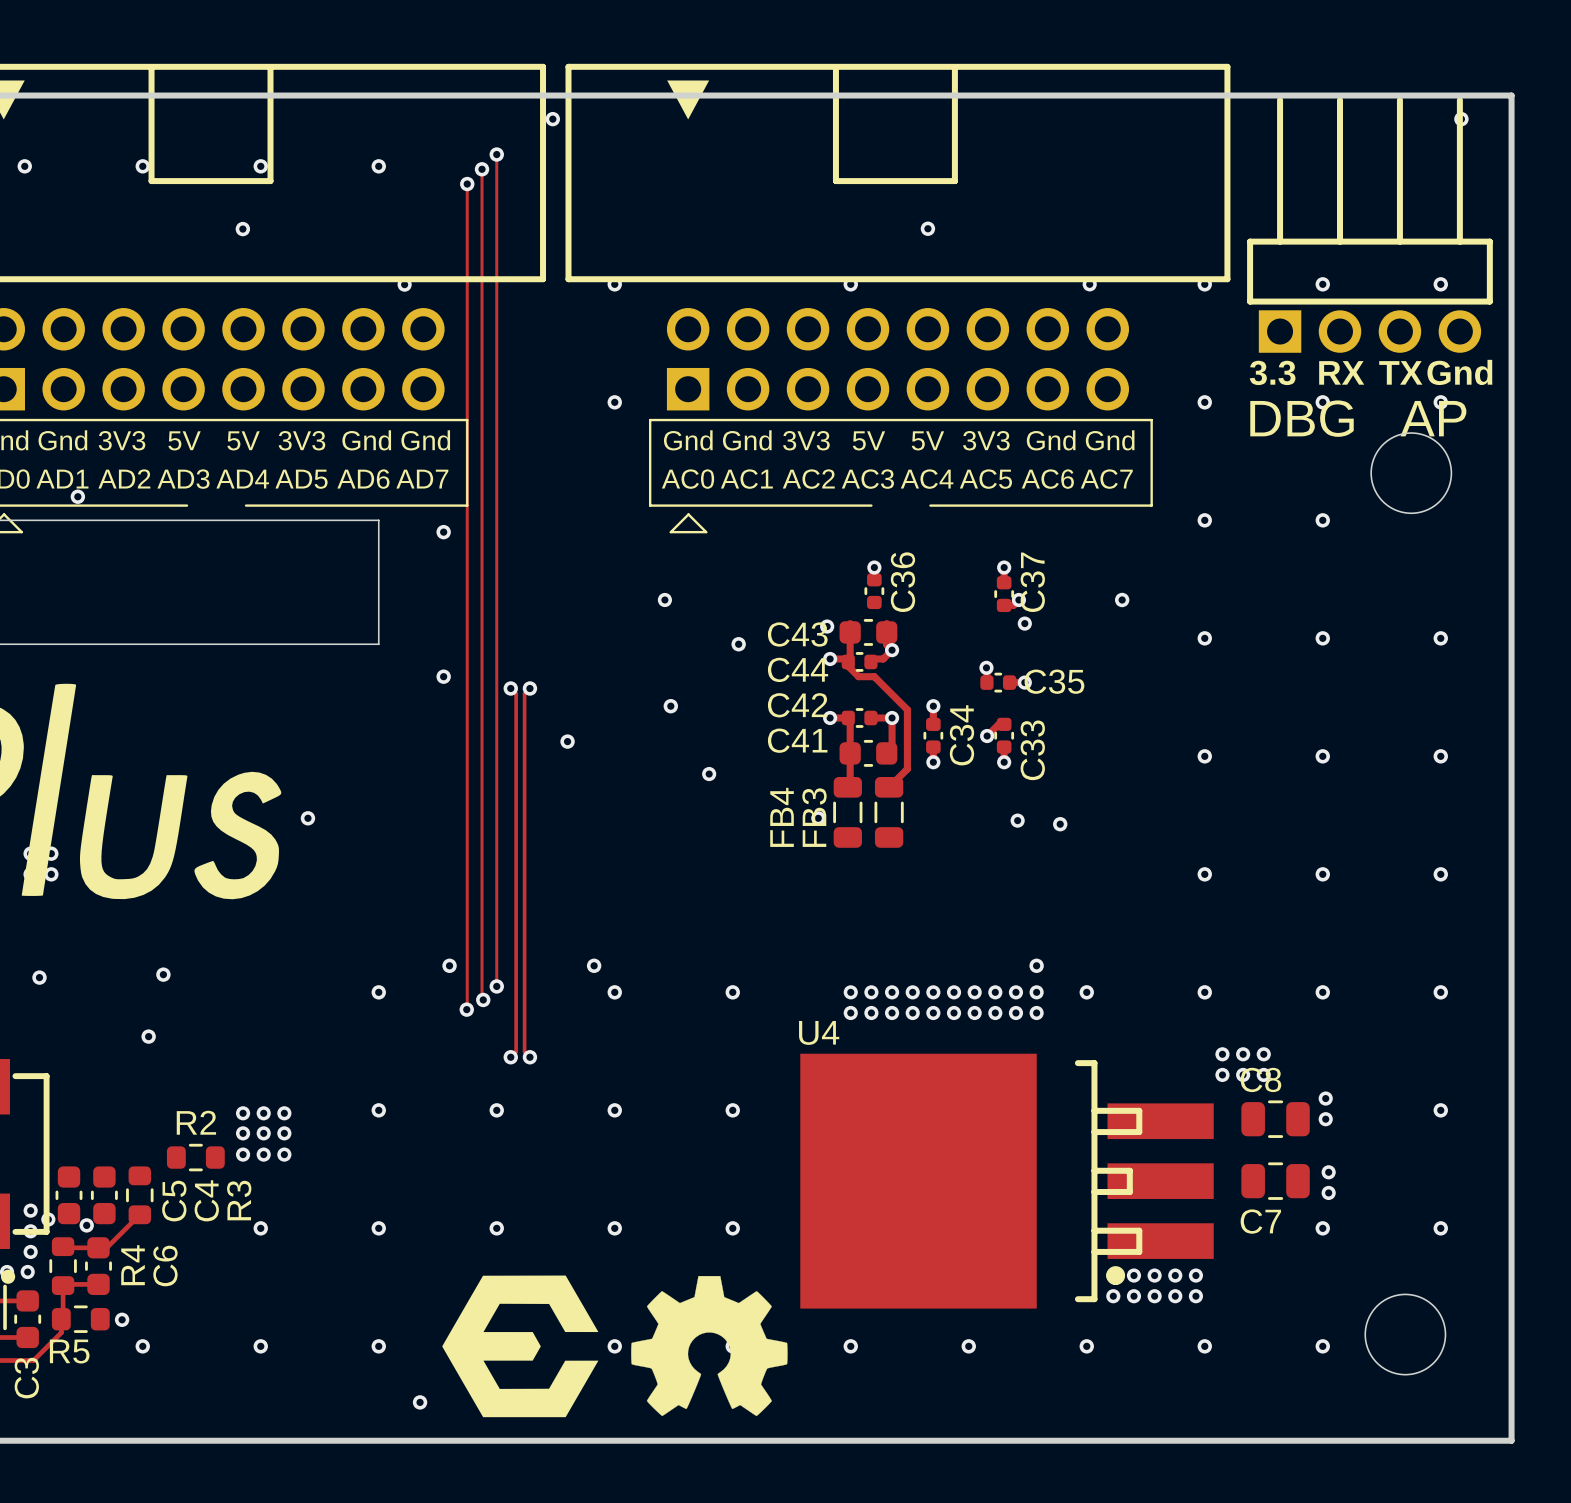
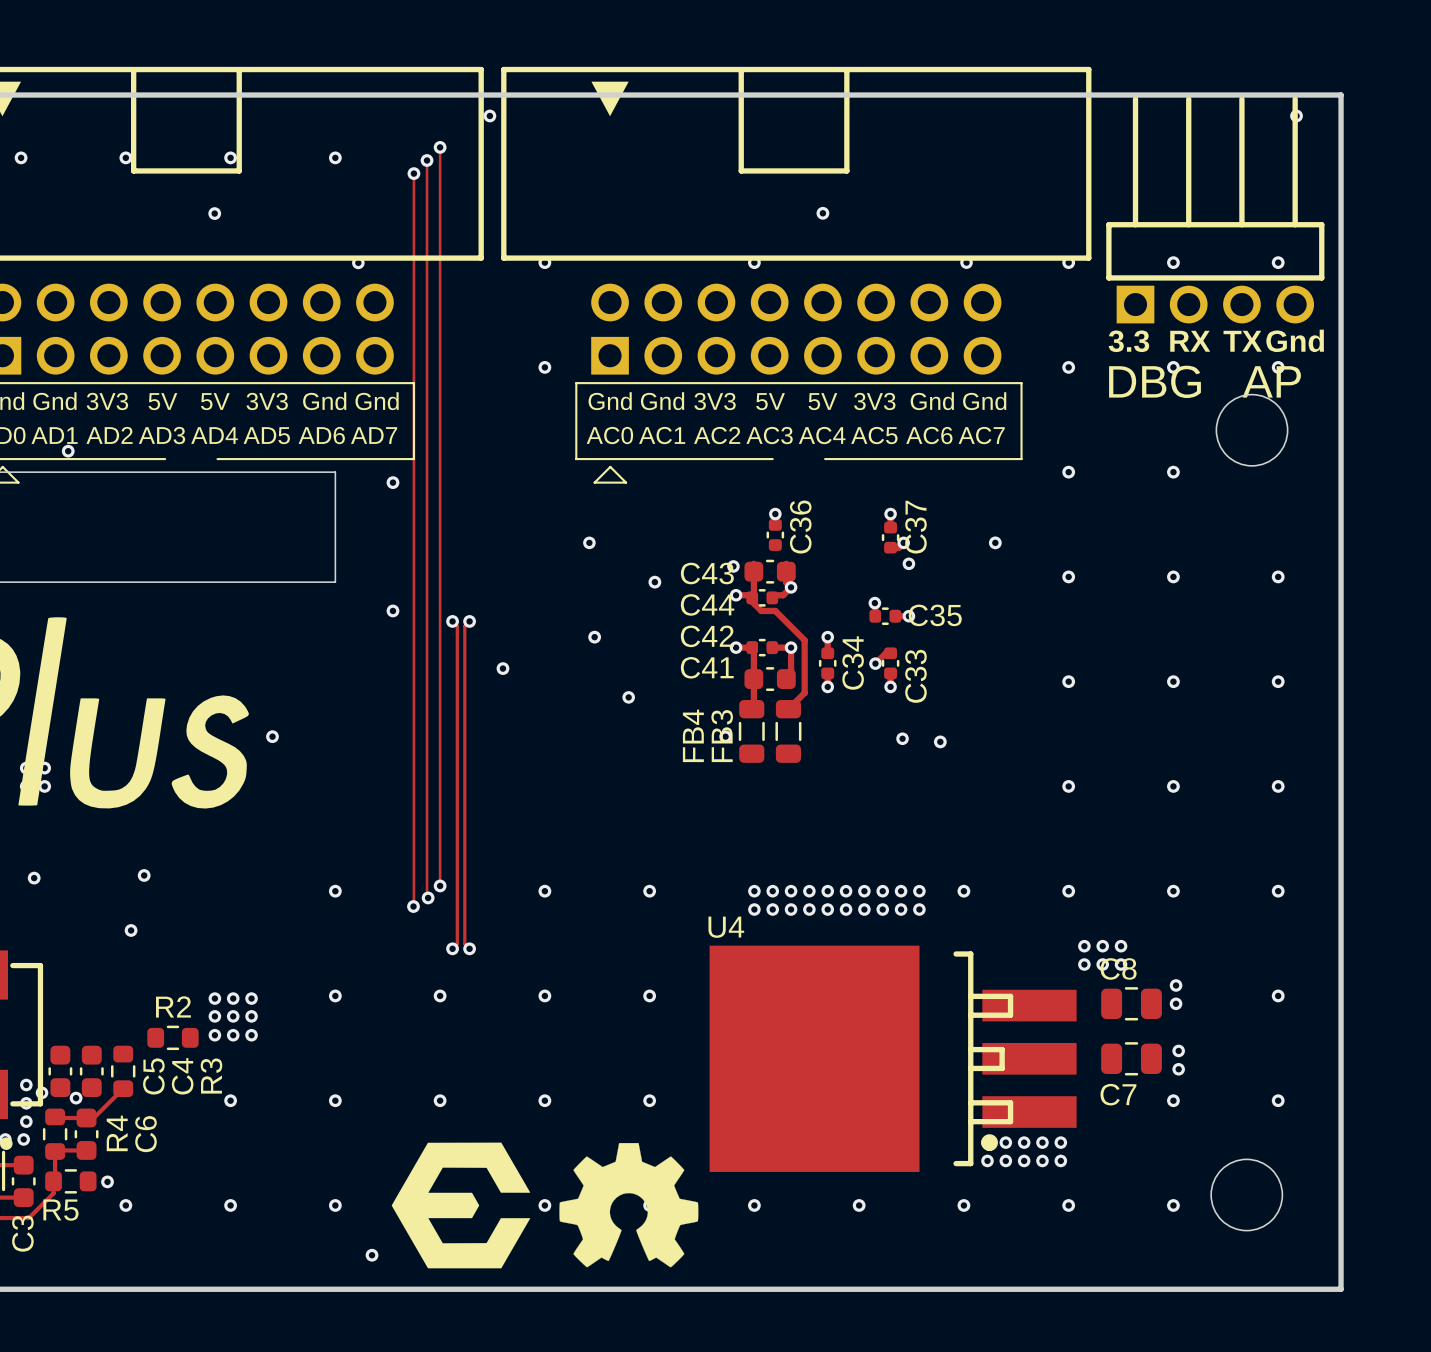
via: (449, 965) -> none
via: (594, 965) -> none
via: (1036, 965) -> none

